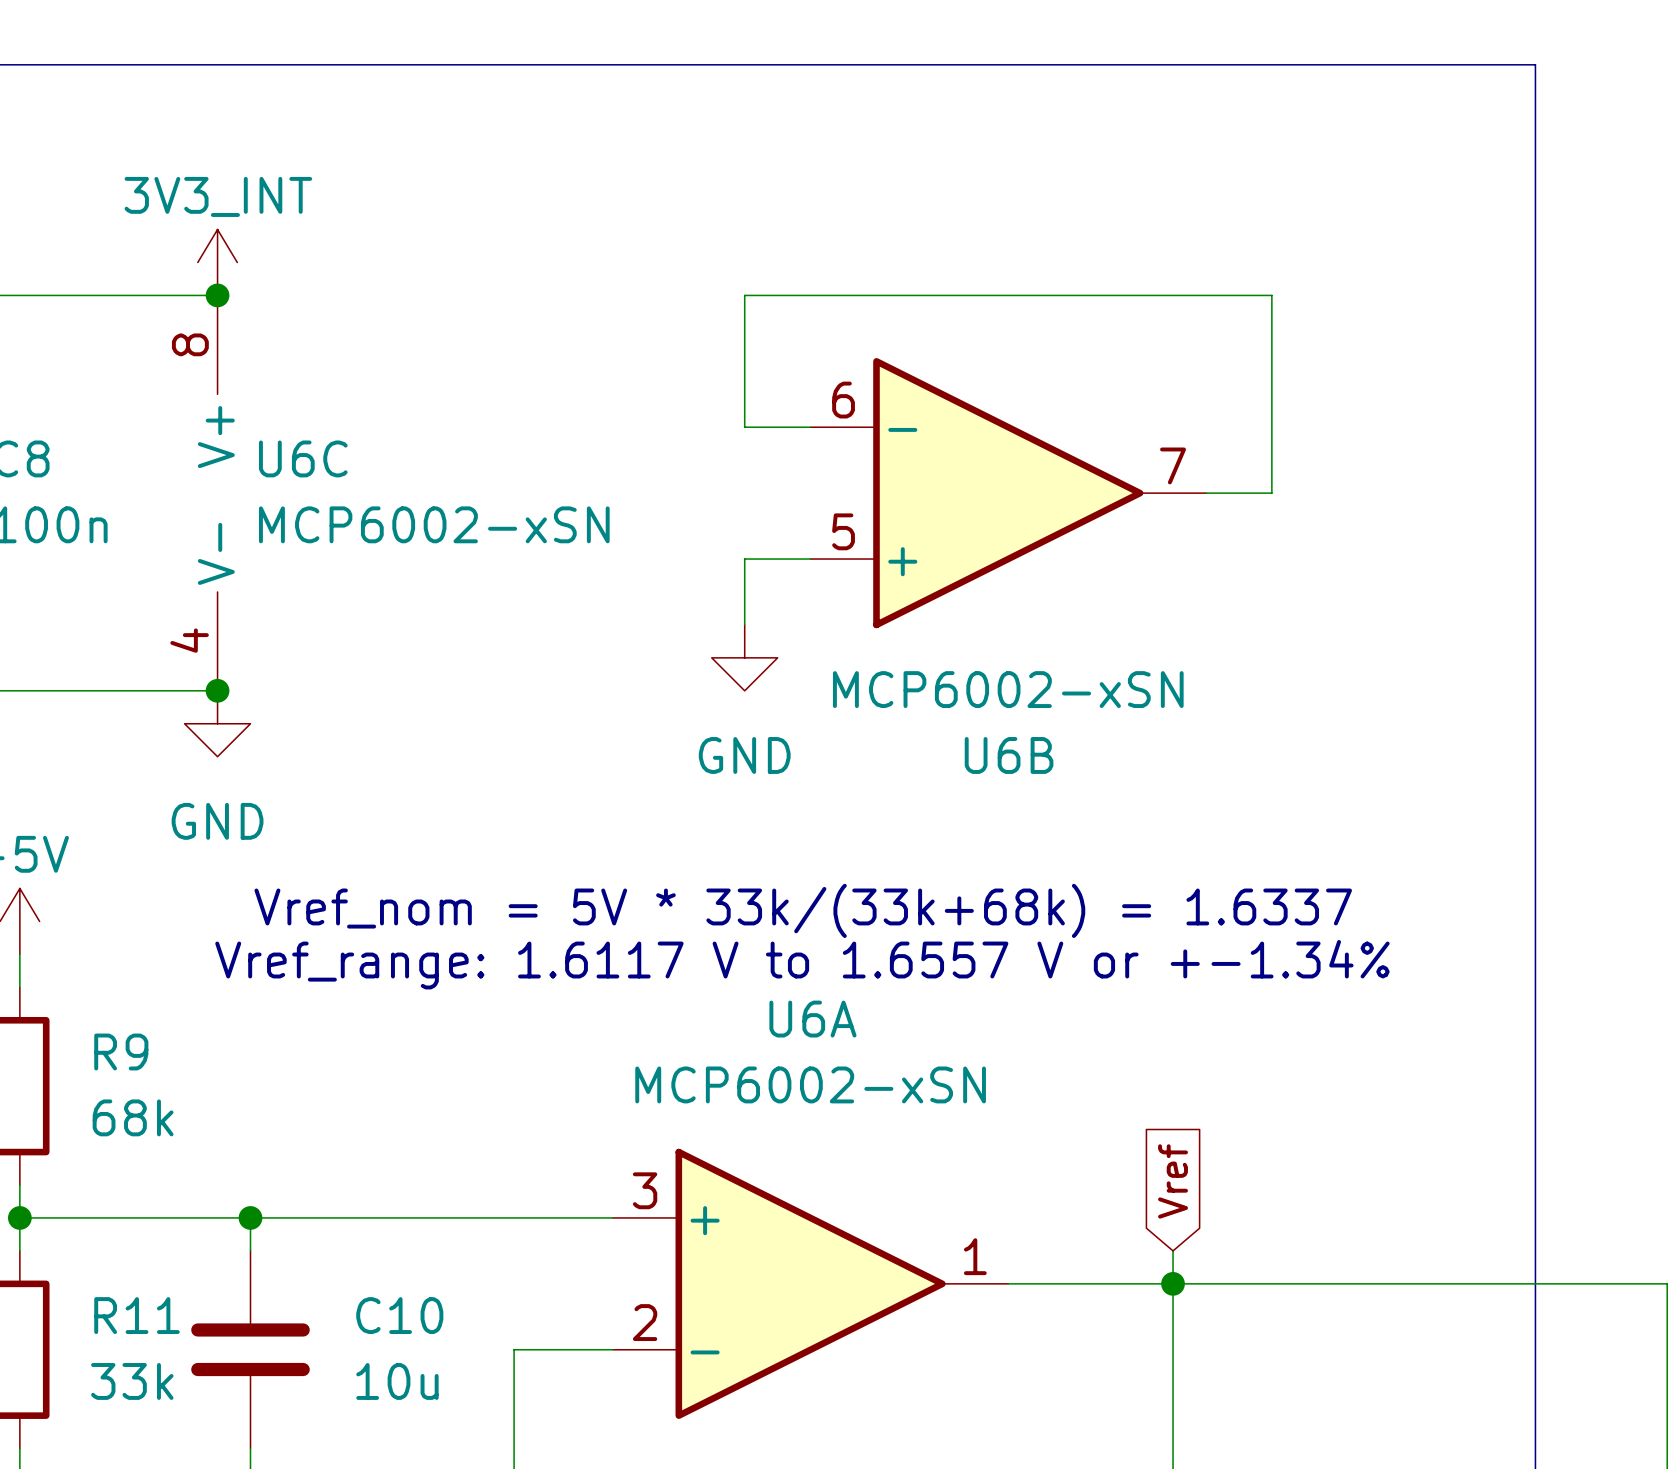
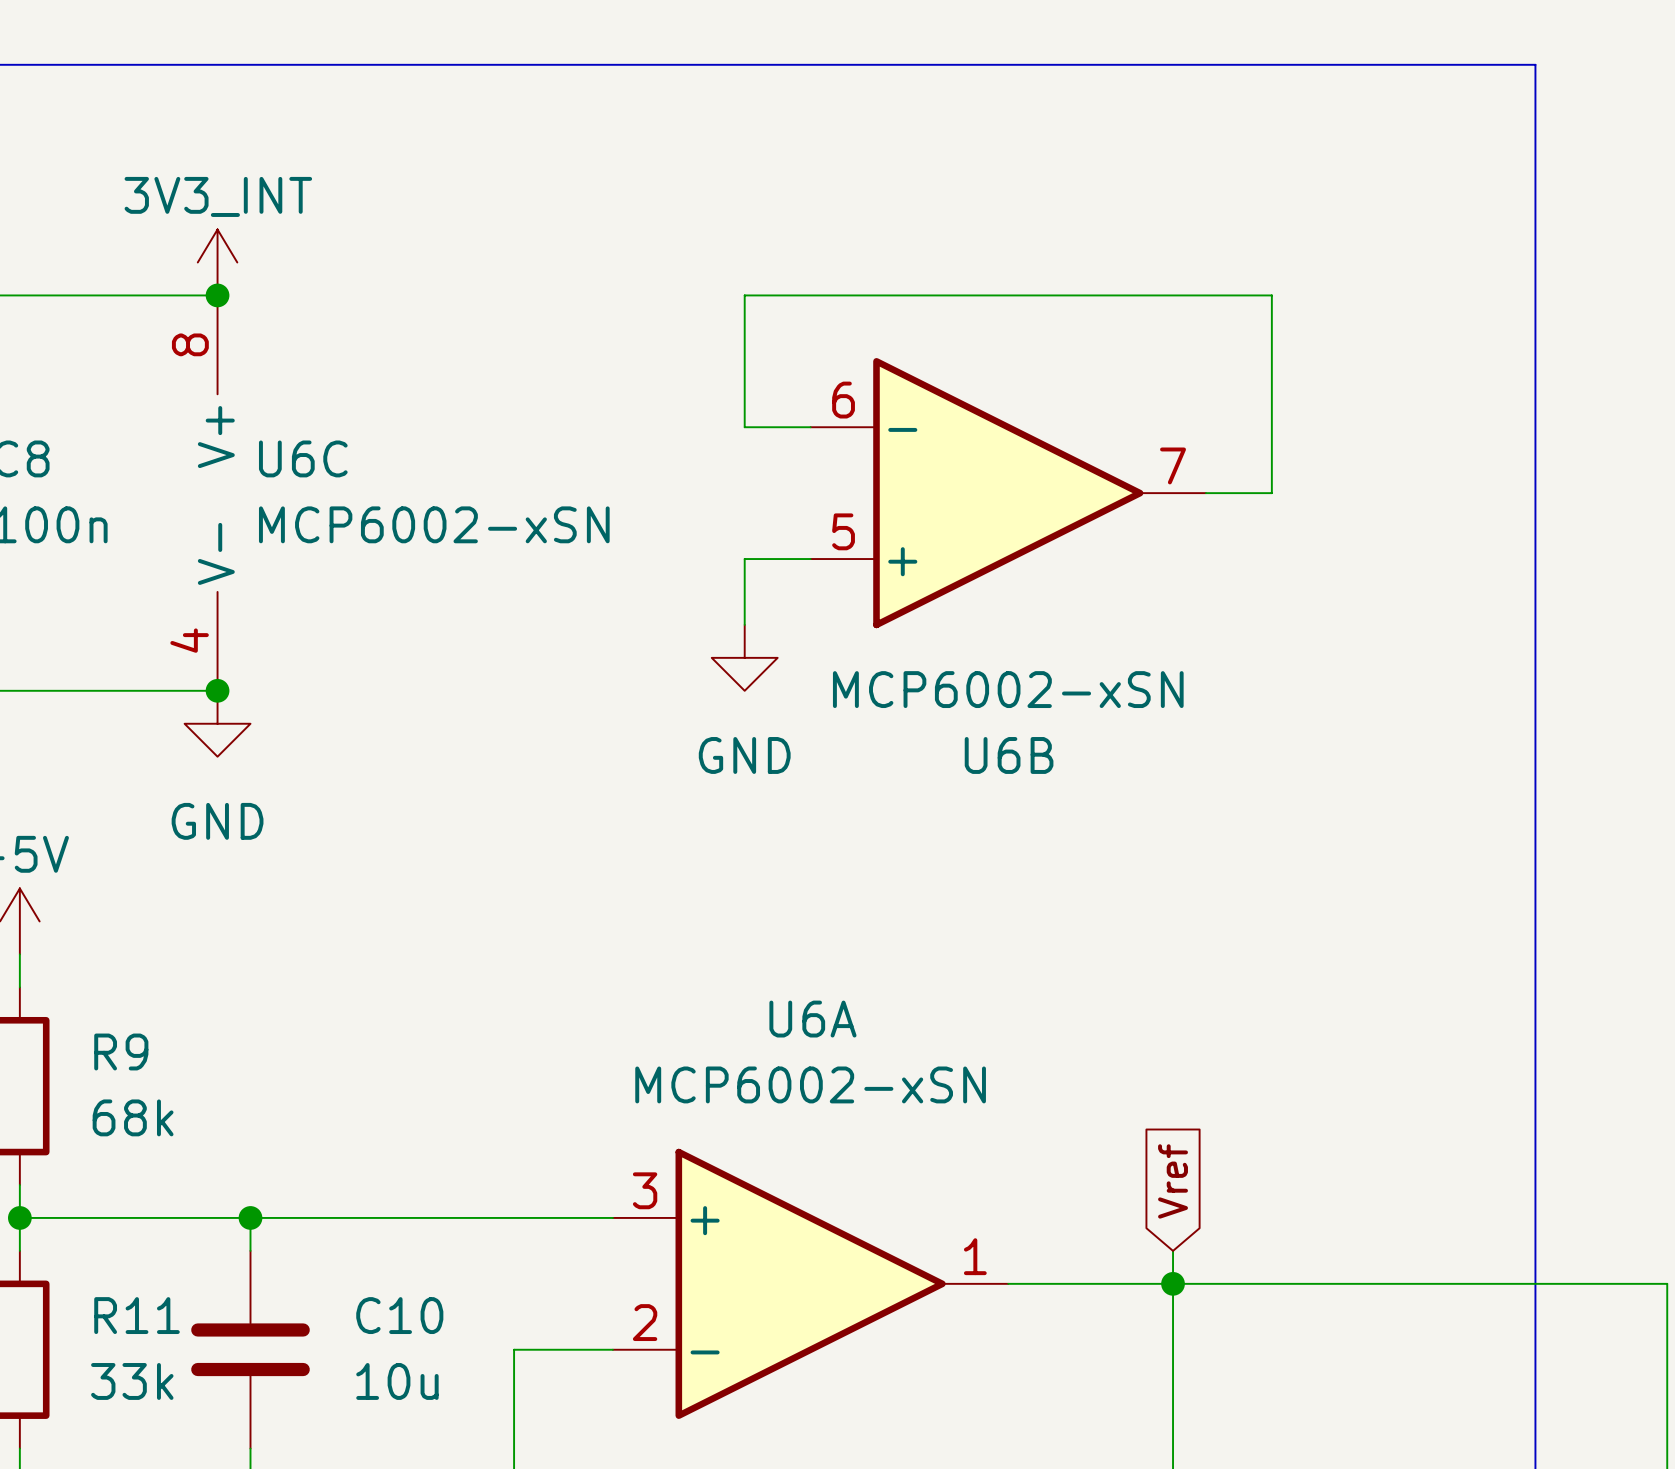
text: Vref_nom = 5V * 33k/(33k+68k) = 1.6337 (803, 910) -> none
text: Vref_range: 1.6117 V to 1.6557 V or +-1.34% (802, 964) -> none

